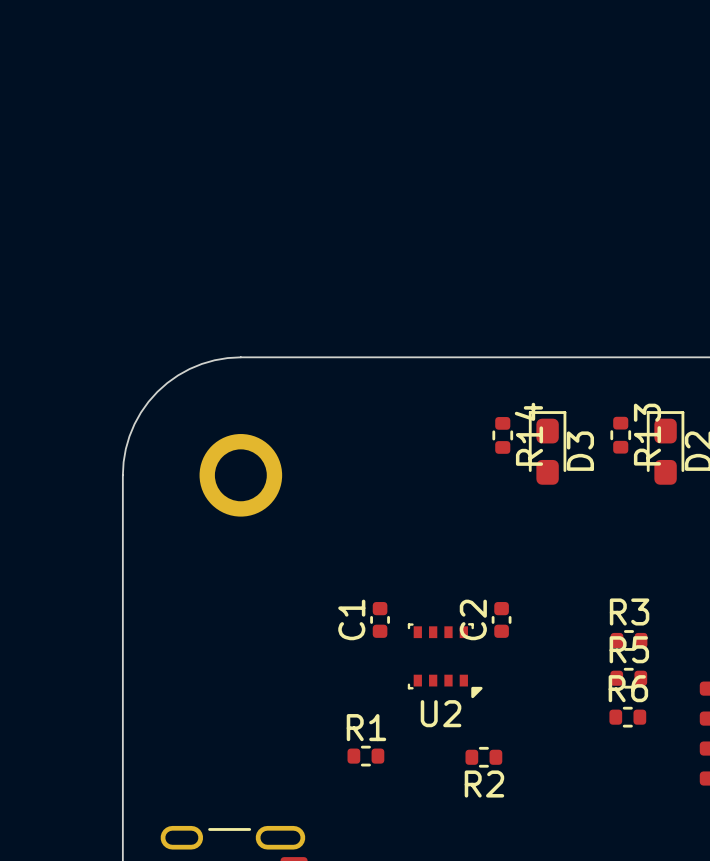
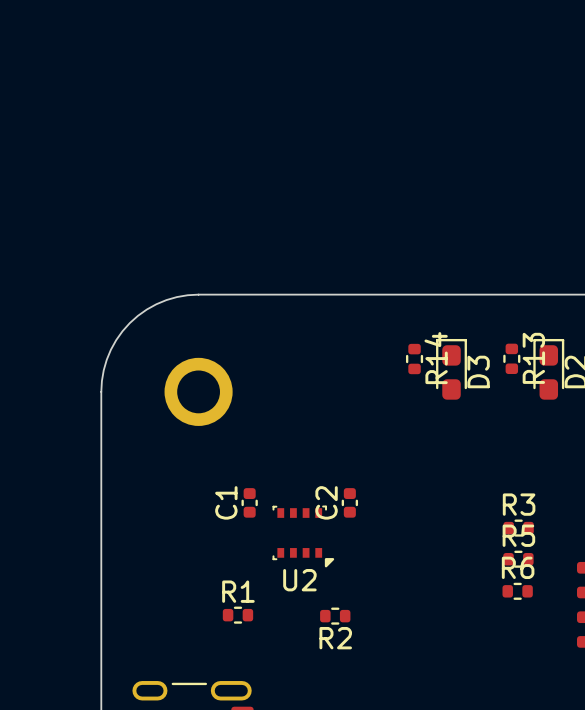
C1 position: (380, 619) -> (249, 502)
C2 position: (501, 619) -> (349, 502)
U2 position: (445, 660) -> (303, 536)
R1 position: (365, 756) -> (237, 615)
R2 position: (483, 757) -> (335, 616)

